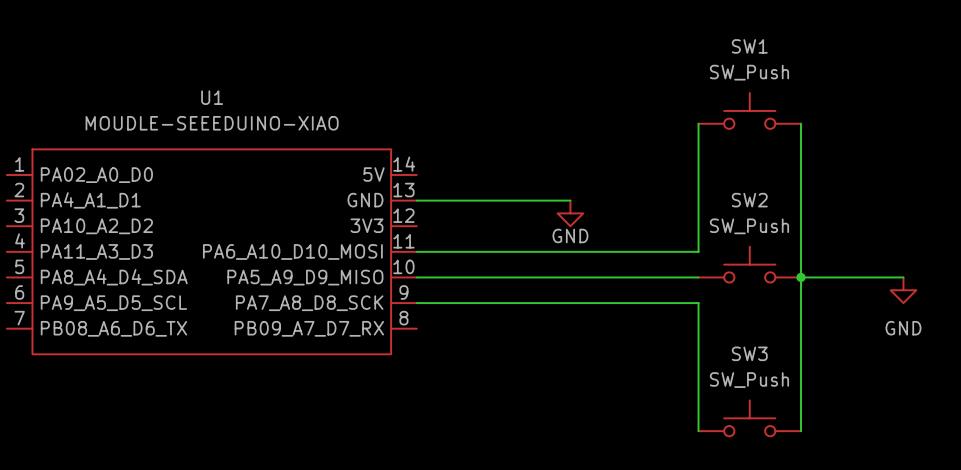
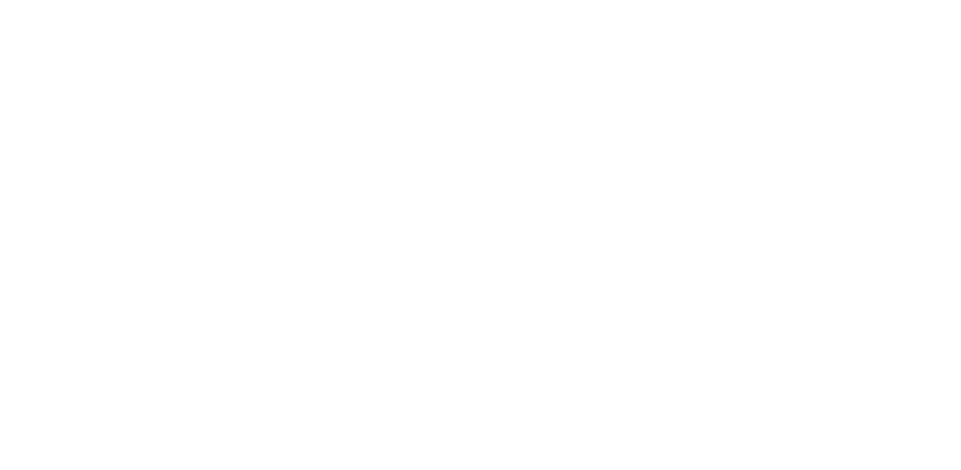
SW1: SW_Push (749, 110) -> none
wire: (698, 123) (698, 251) (416, 251) -> none
wire: (801, 123) (801, 431) -> none
wire: (416, 200) (570, 200) -> none
power symbol: GND (570, 213) -> none
U1: MOUDLE-SEEEDUINO-XIAO (211, 251) -> none
SW2: SW_Push (749, 264) -> none
wire: (416, 277) (698, 277) -> none
wire: (801, 277) (903, 277) -> none
junction: (801, 277) -> none
power symbol: GND (903, 290) -> none
wire: (416, 303) (698, 303) (698, 431) -> none
SW3: SW_Push (749, 418) -> none

